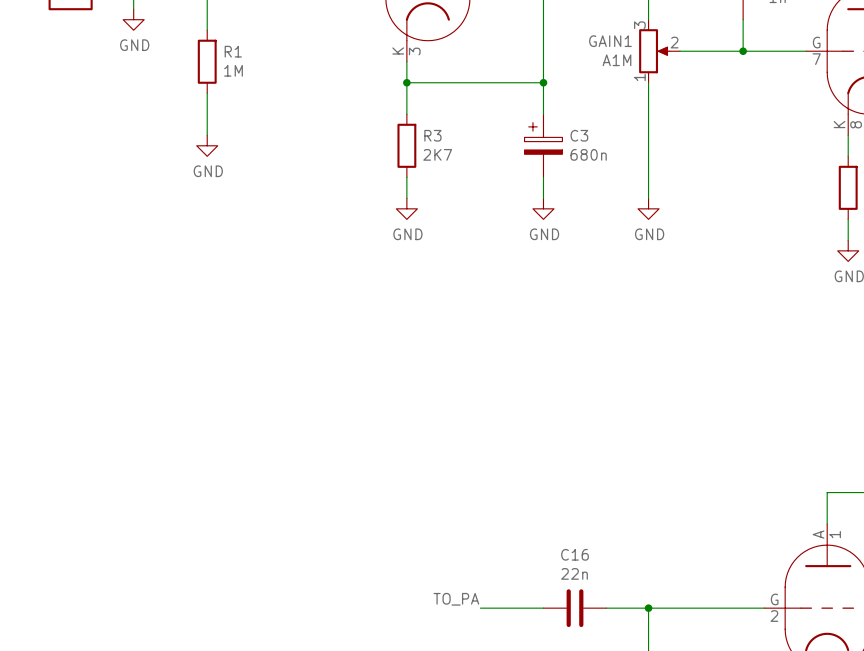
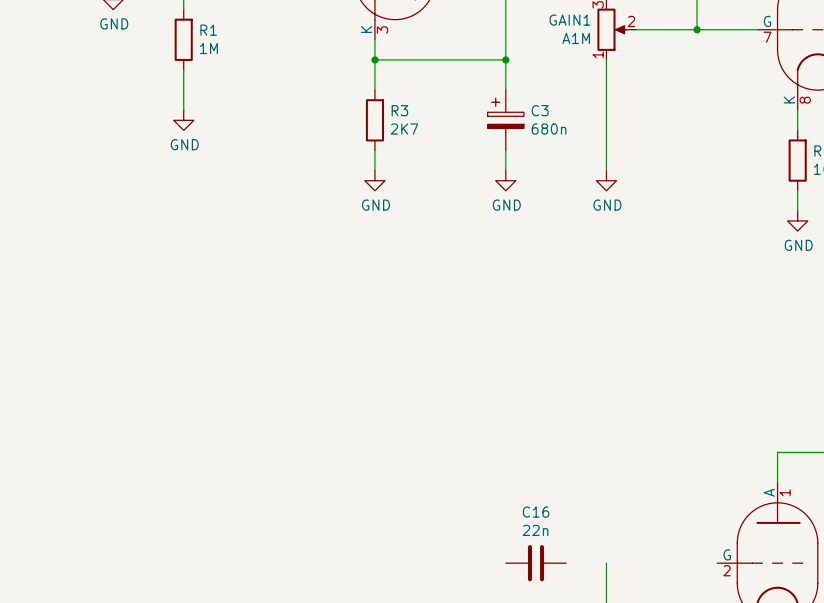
label: TO_PA (456, 599) -> none
wire: (480, 608) (543, 608) -> none
wire: (606, 608) (764, 608) -> none
junction: (648, 608) -> none

